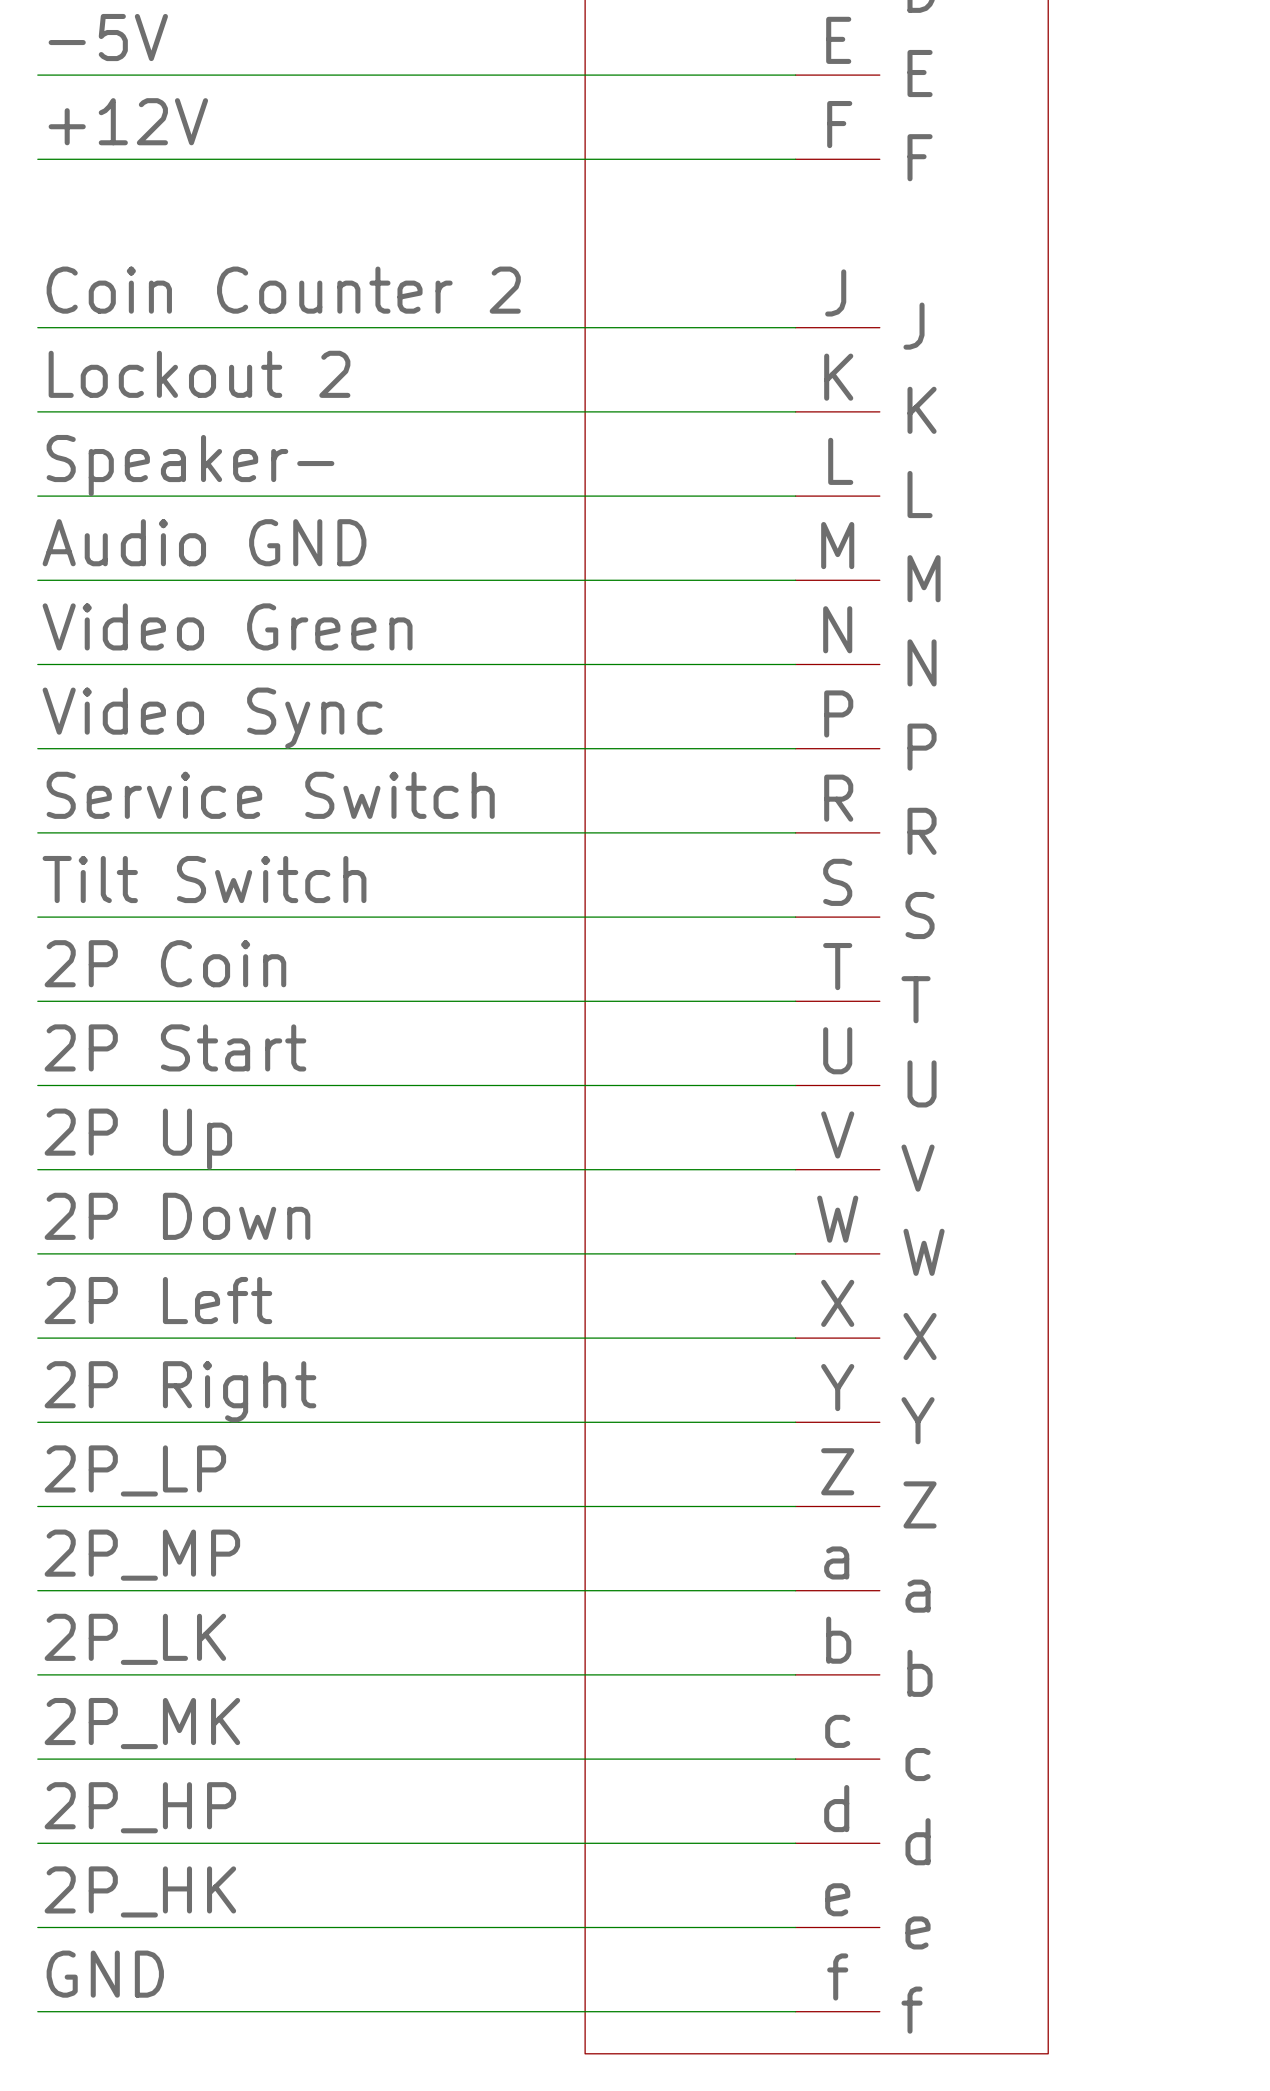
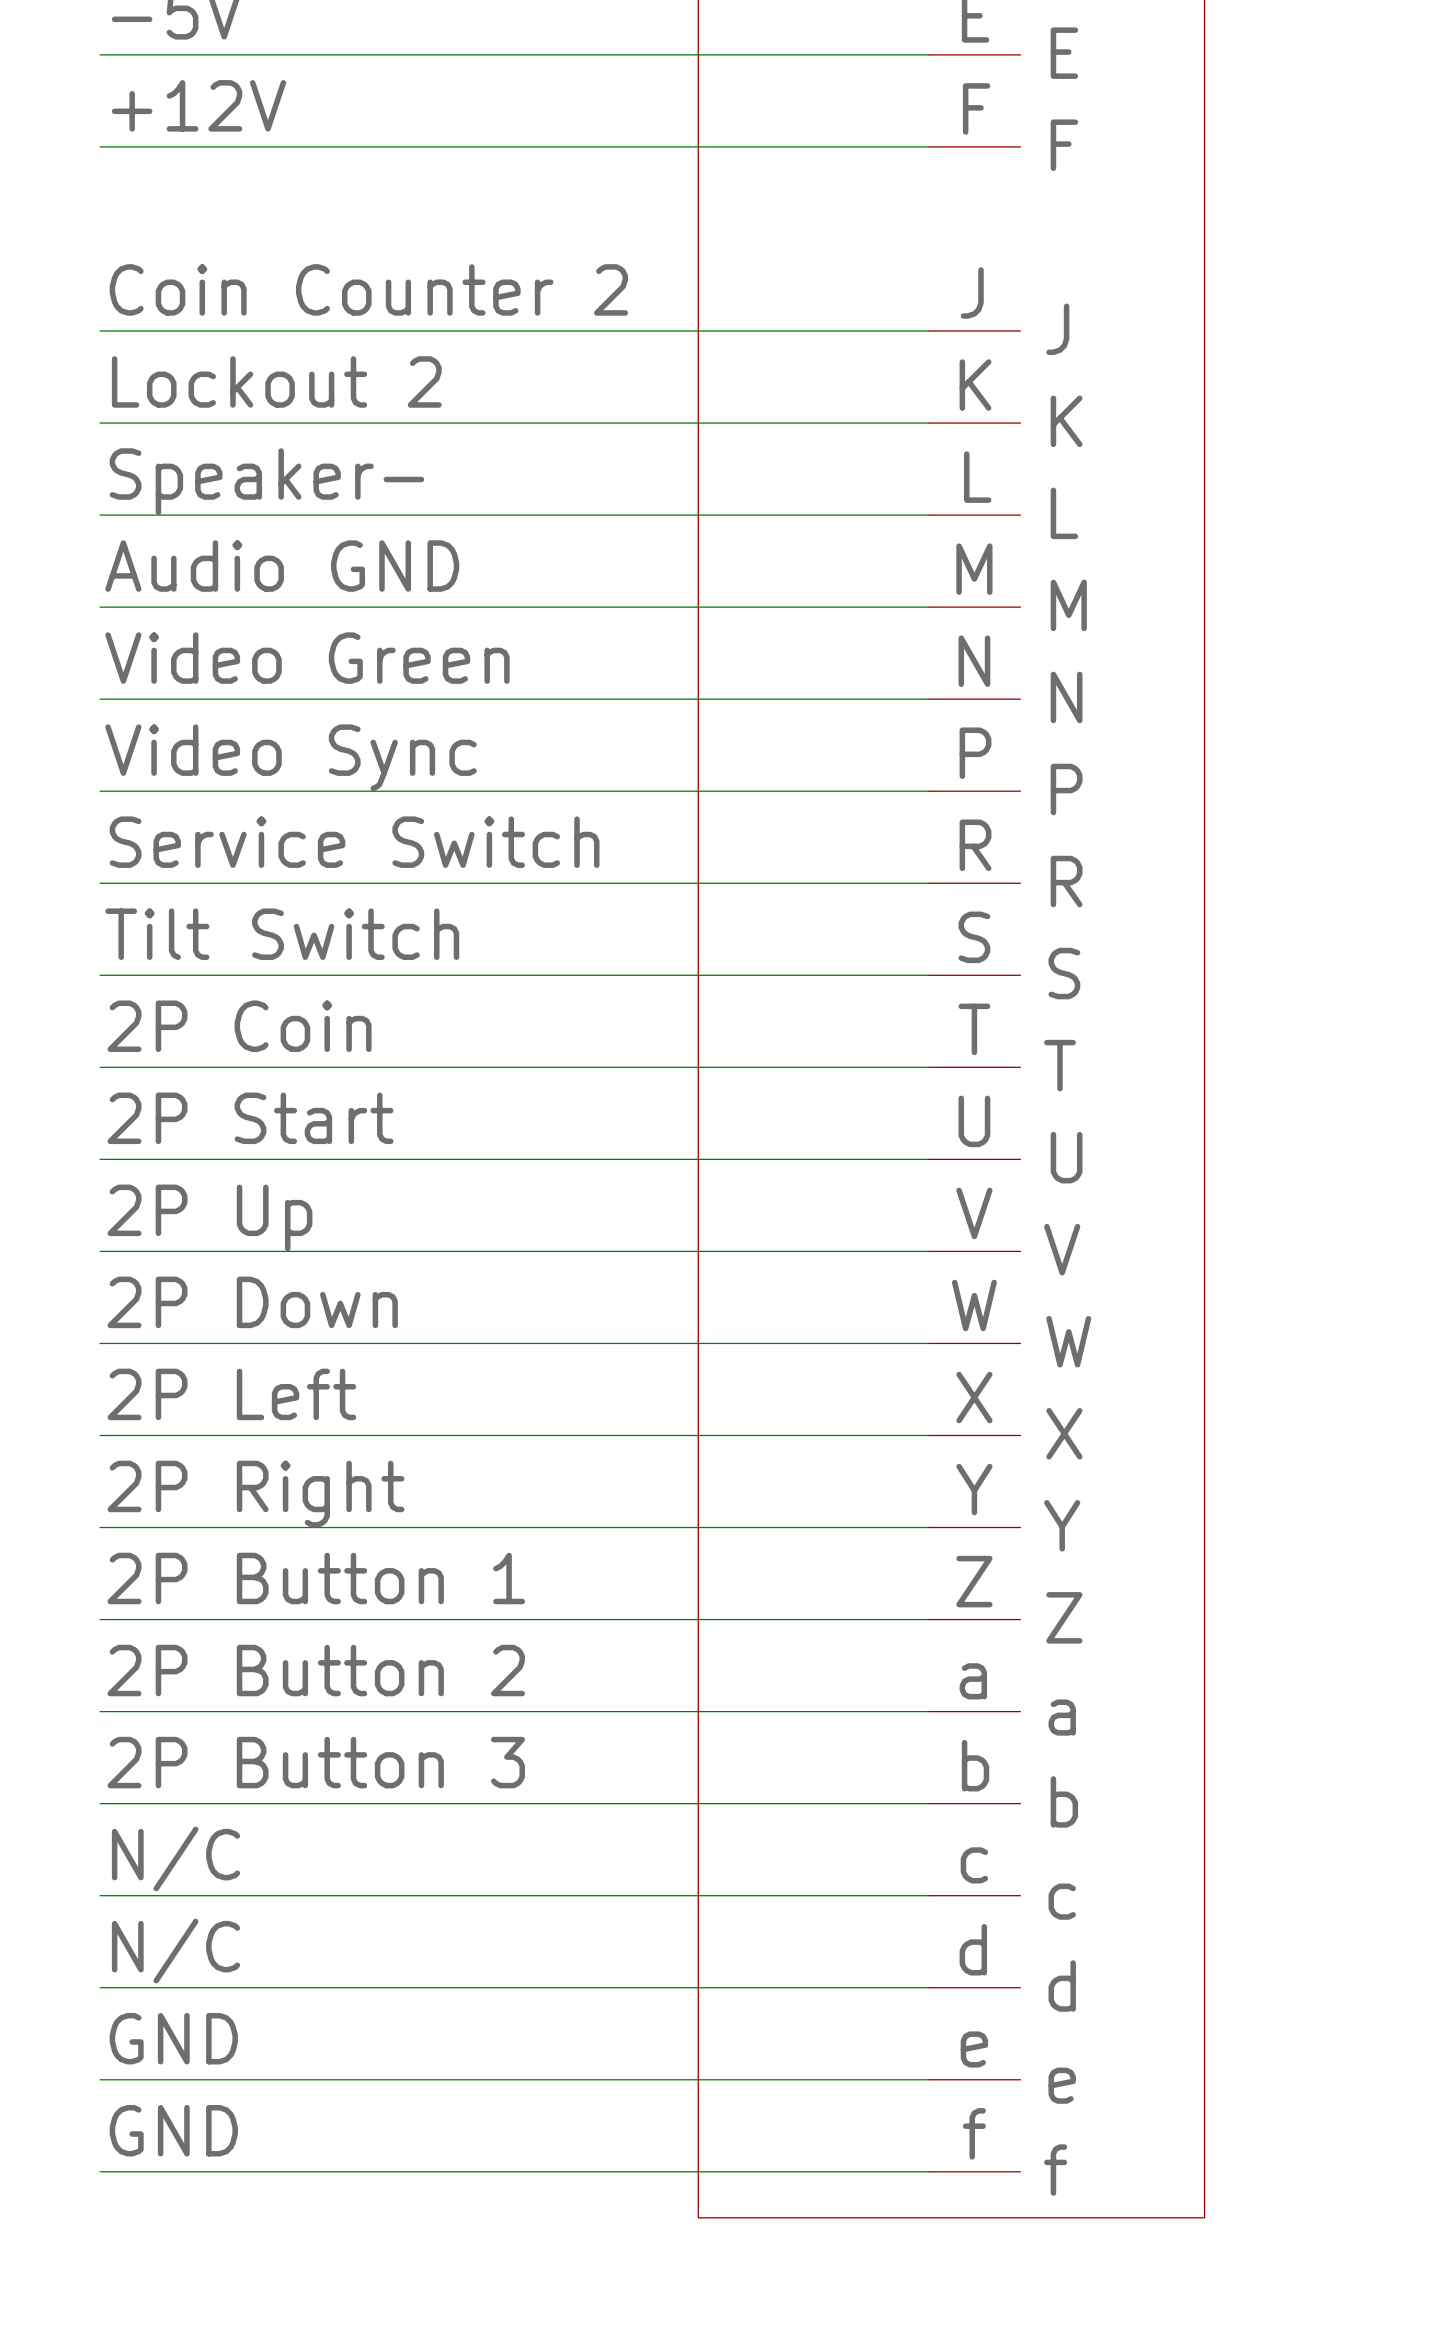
label: 2P_LP (135, 1470) -> 2P Button 1 (316, 1578)
label: 2P_MP (142, 1555) -> 2P Button 2 (316, 1670)
label: 2P_LK (135, 1639) -> 2P Button 3 (316, 1762)
label: 2P_MK (142, 1723) -> N/C (175, 1859)
label: 2P_HP (140, 1807) -> N/C (175, 1951)
label: 2P_HK (140, 1891) -> GND (173, 2038)

